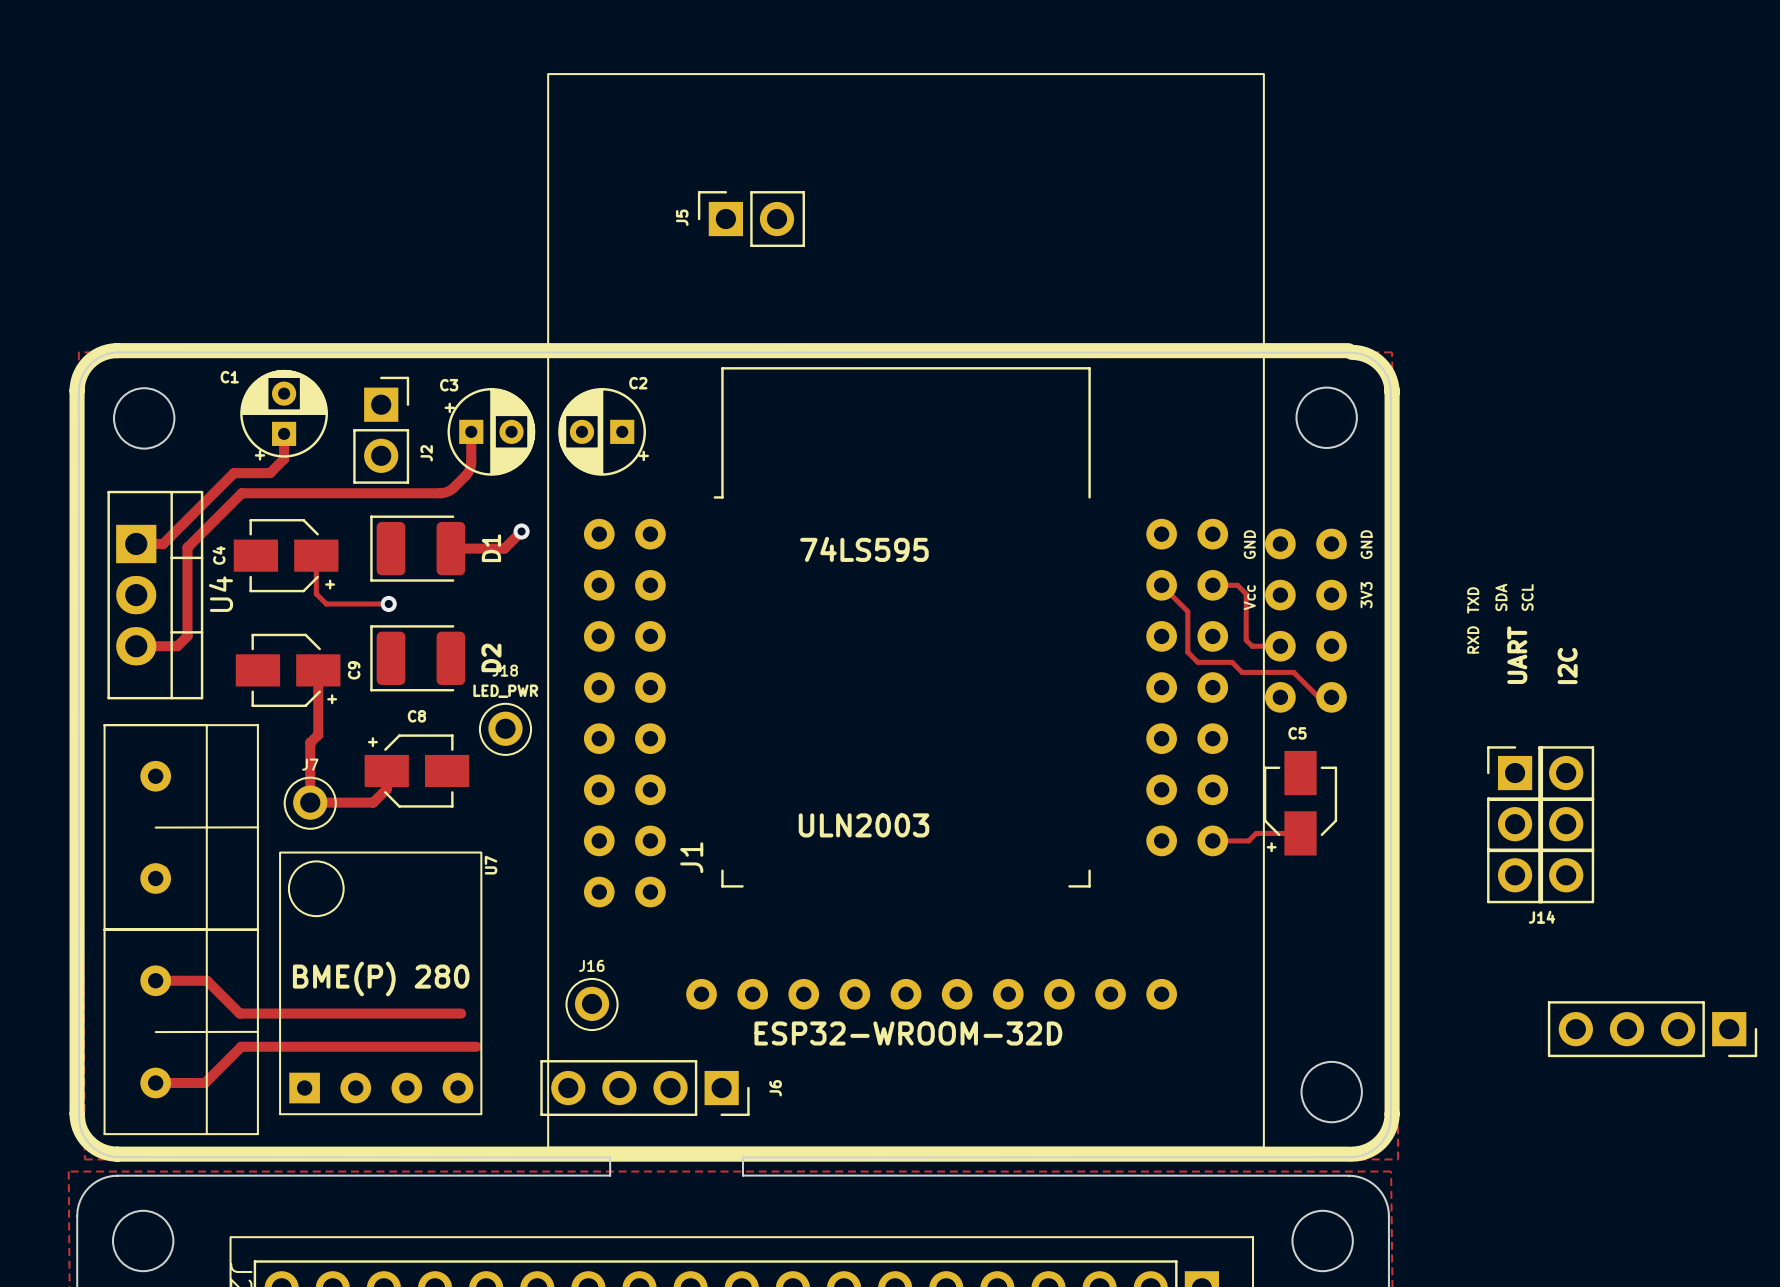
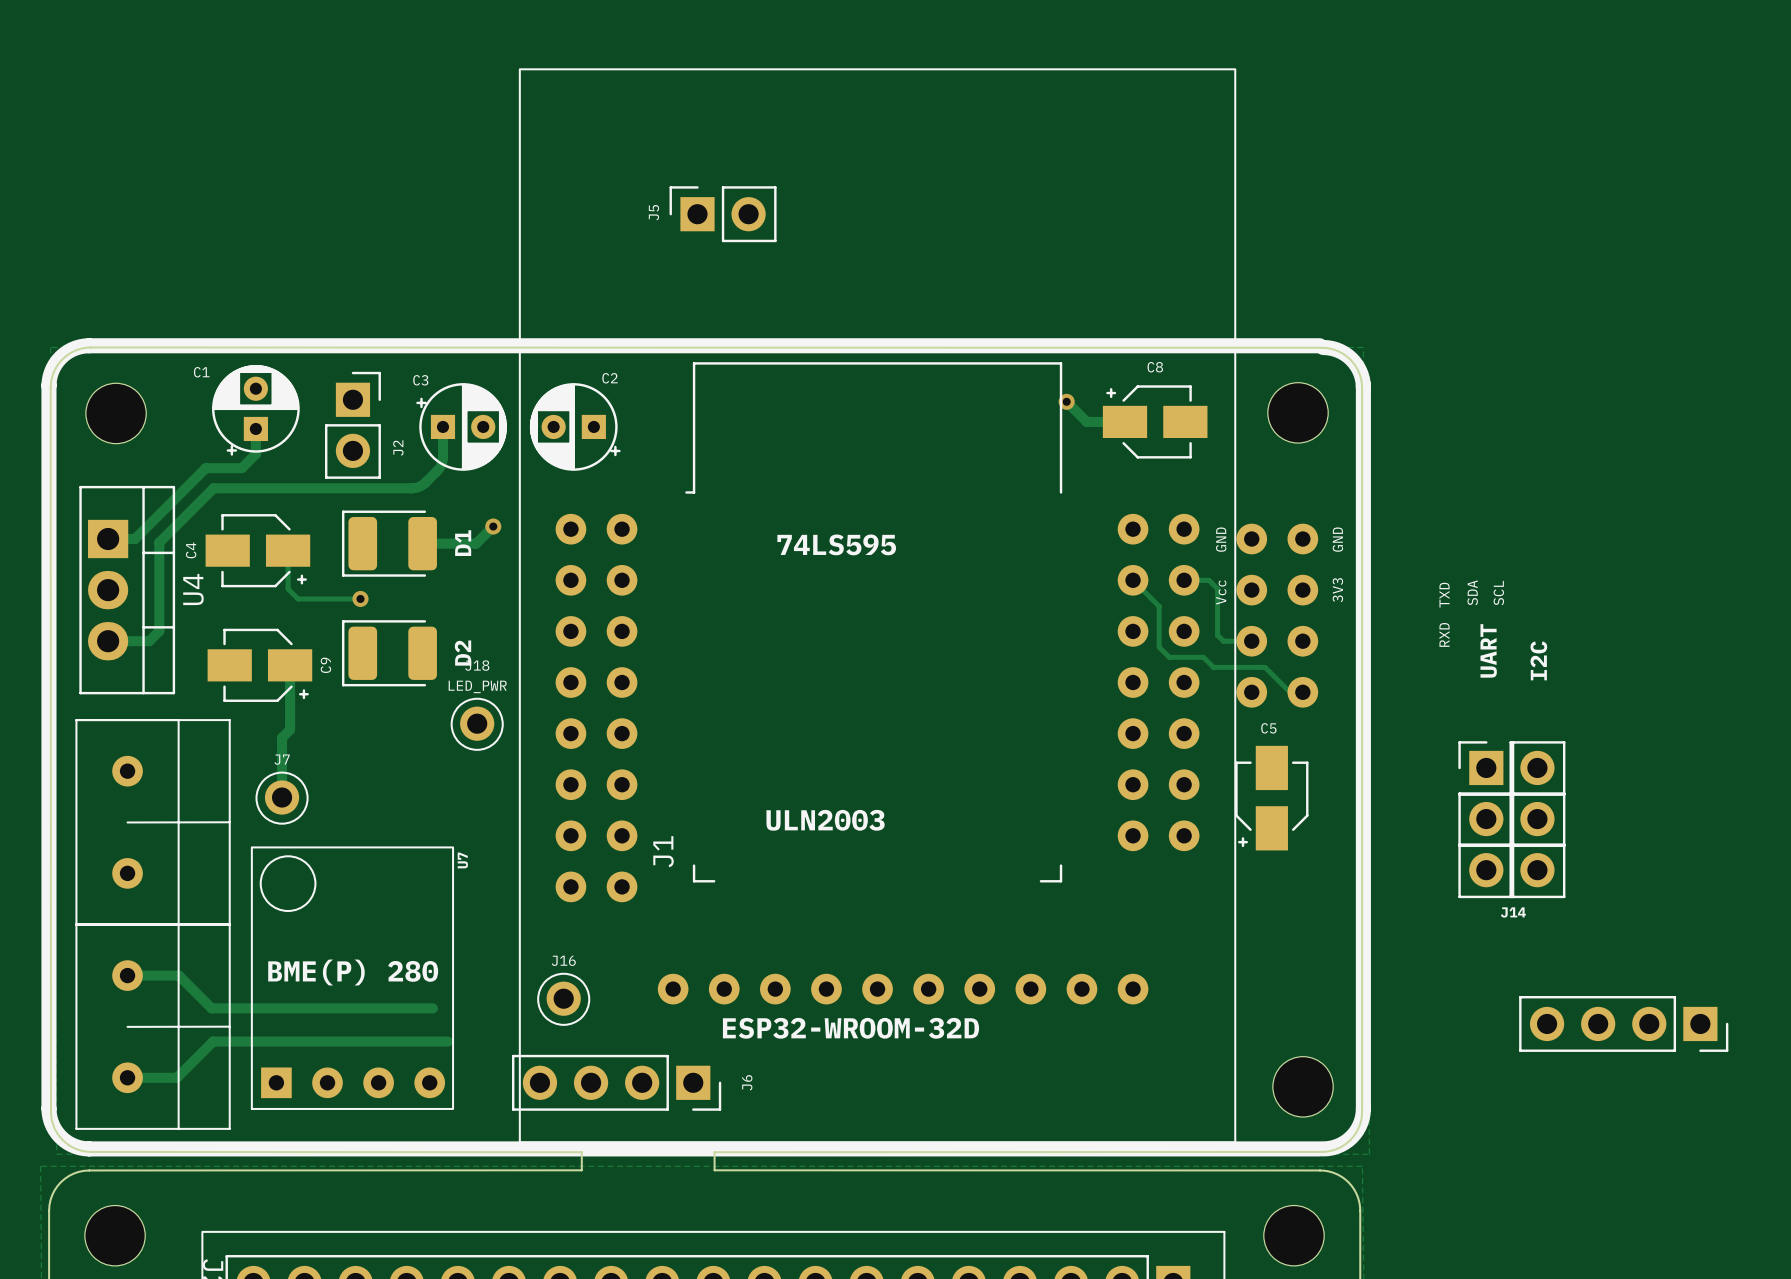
track: none -> (1066, 401) (1086, 421) (1125, 421)
via: none -> (1066, 401)
track: (386, 771) (386, 789) (373, 802) (310, 802) -> none
C8 position: (416, 771) -> (1155, 421)
track: (1300, 833) (1256, 833) (1248, 840) (1212, 840) -> none

